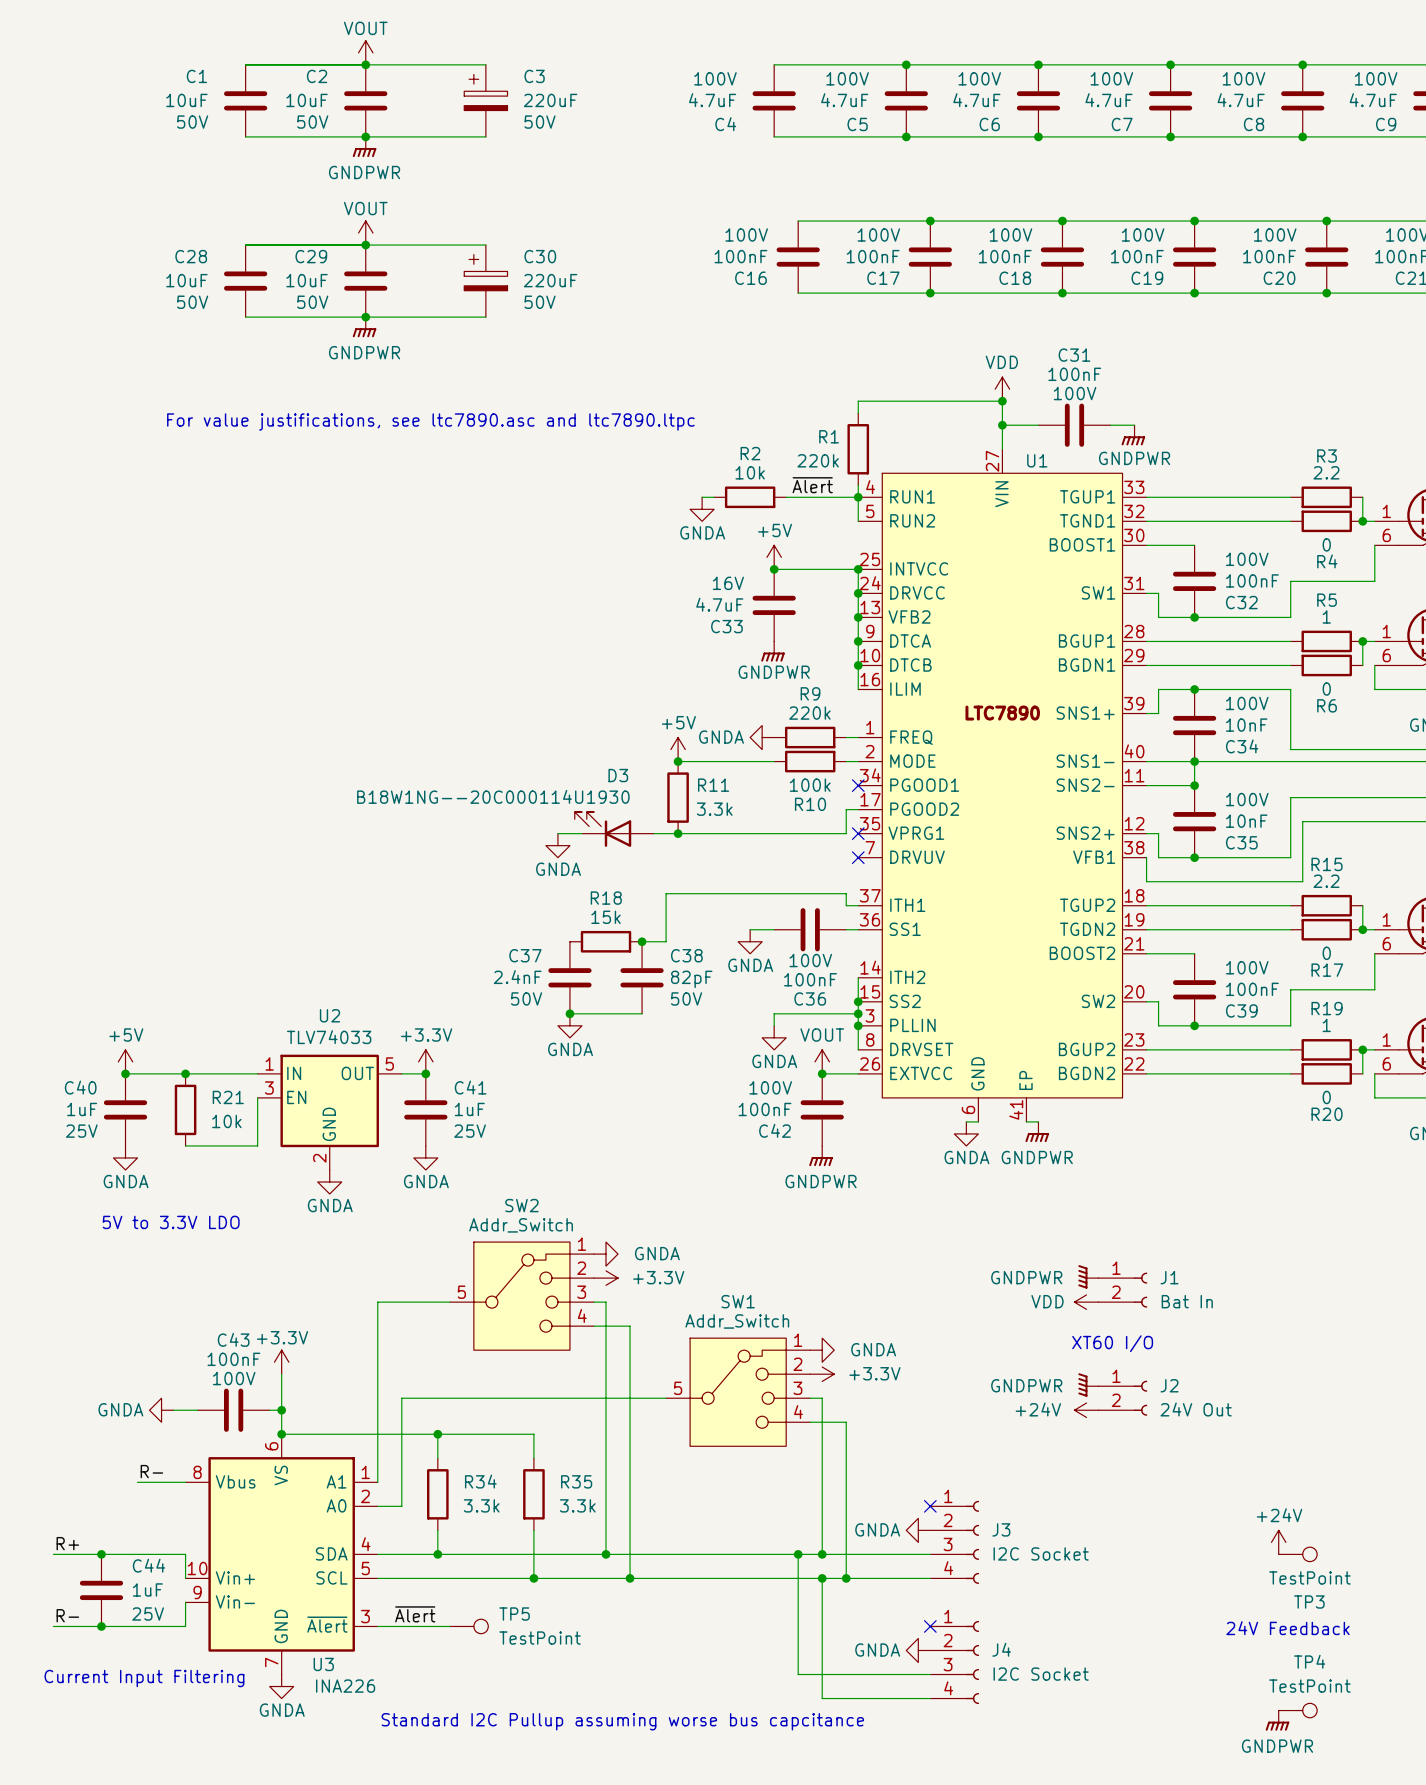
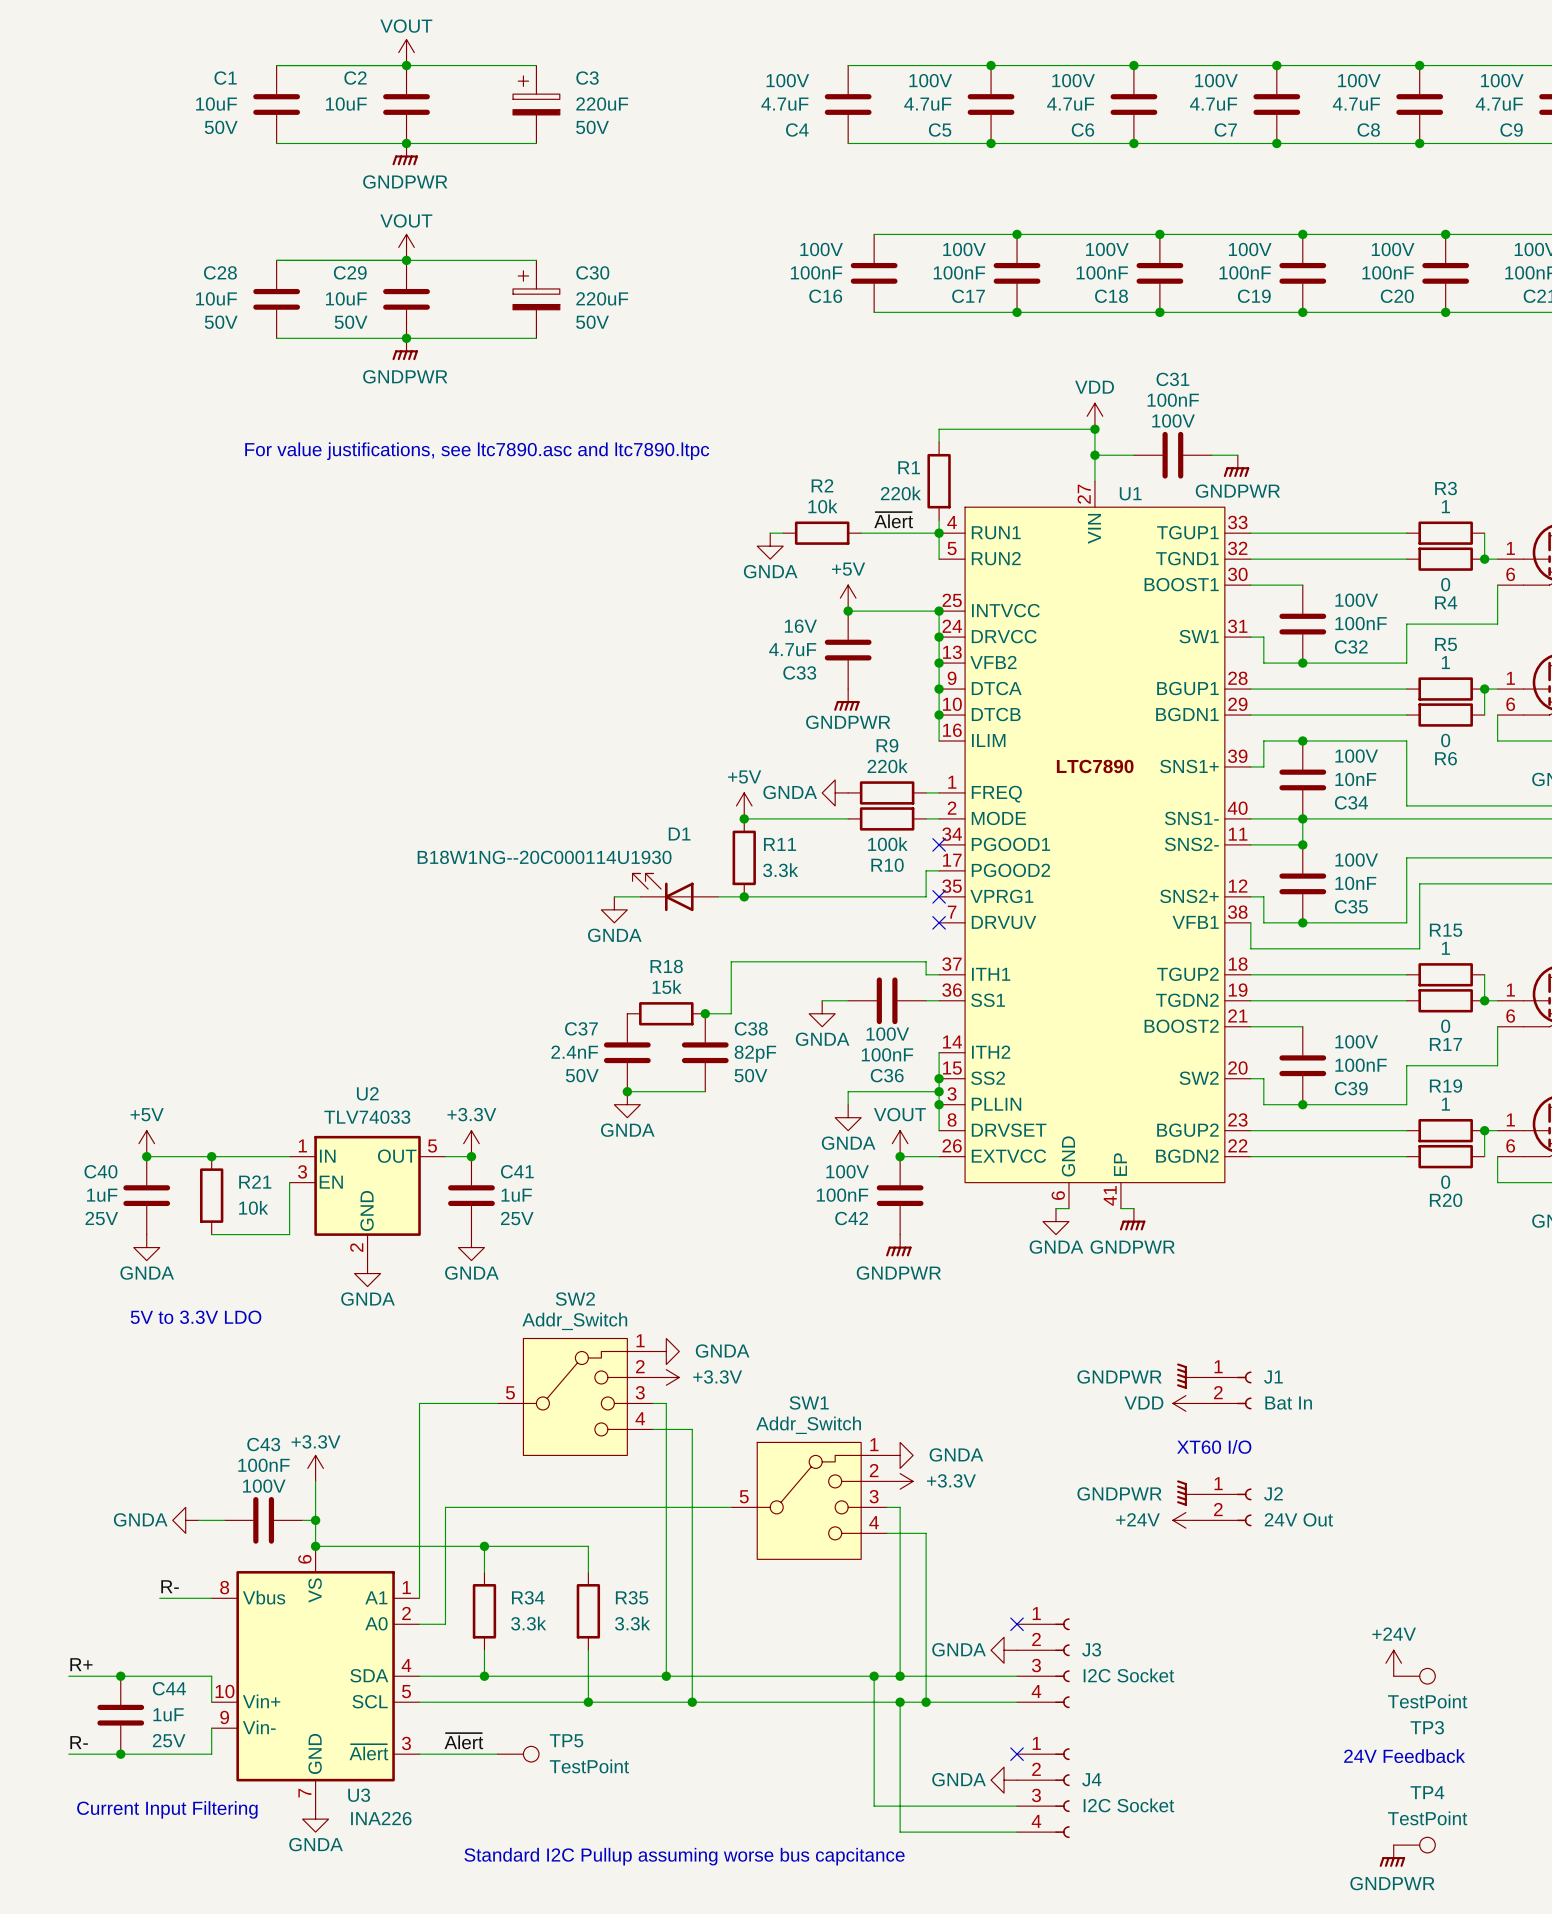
C2 text: 50V (312, 122) -> none
R3 value: 2.2 (1326, 472) -> 1 (1445, 506)
D3 name: D3 (618, 775) -> D1 (679, 834)
R15 value: 2.2 (1326, 881) -> 1 (1445, 948)

